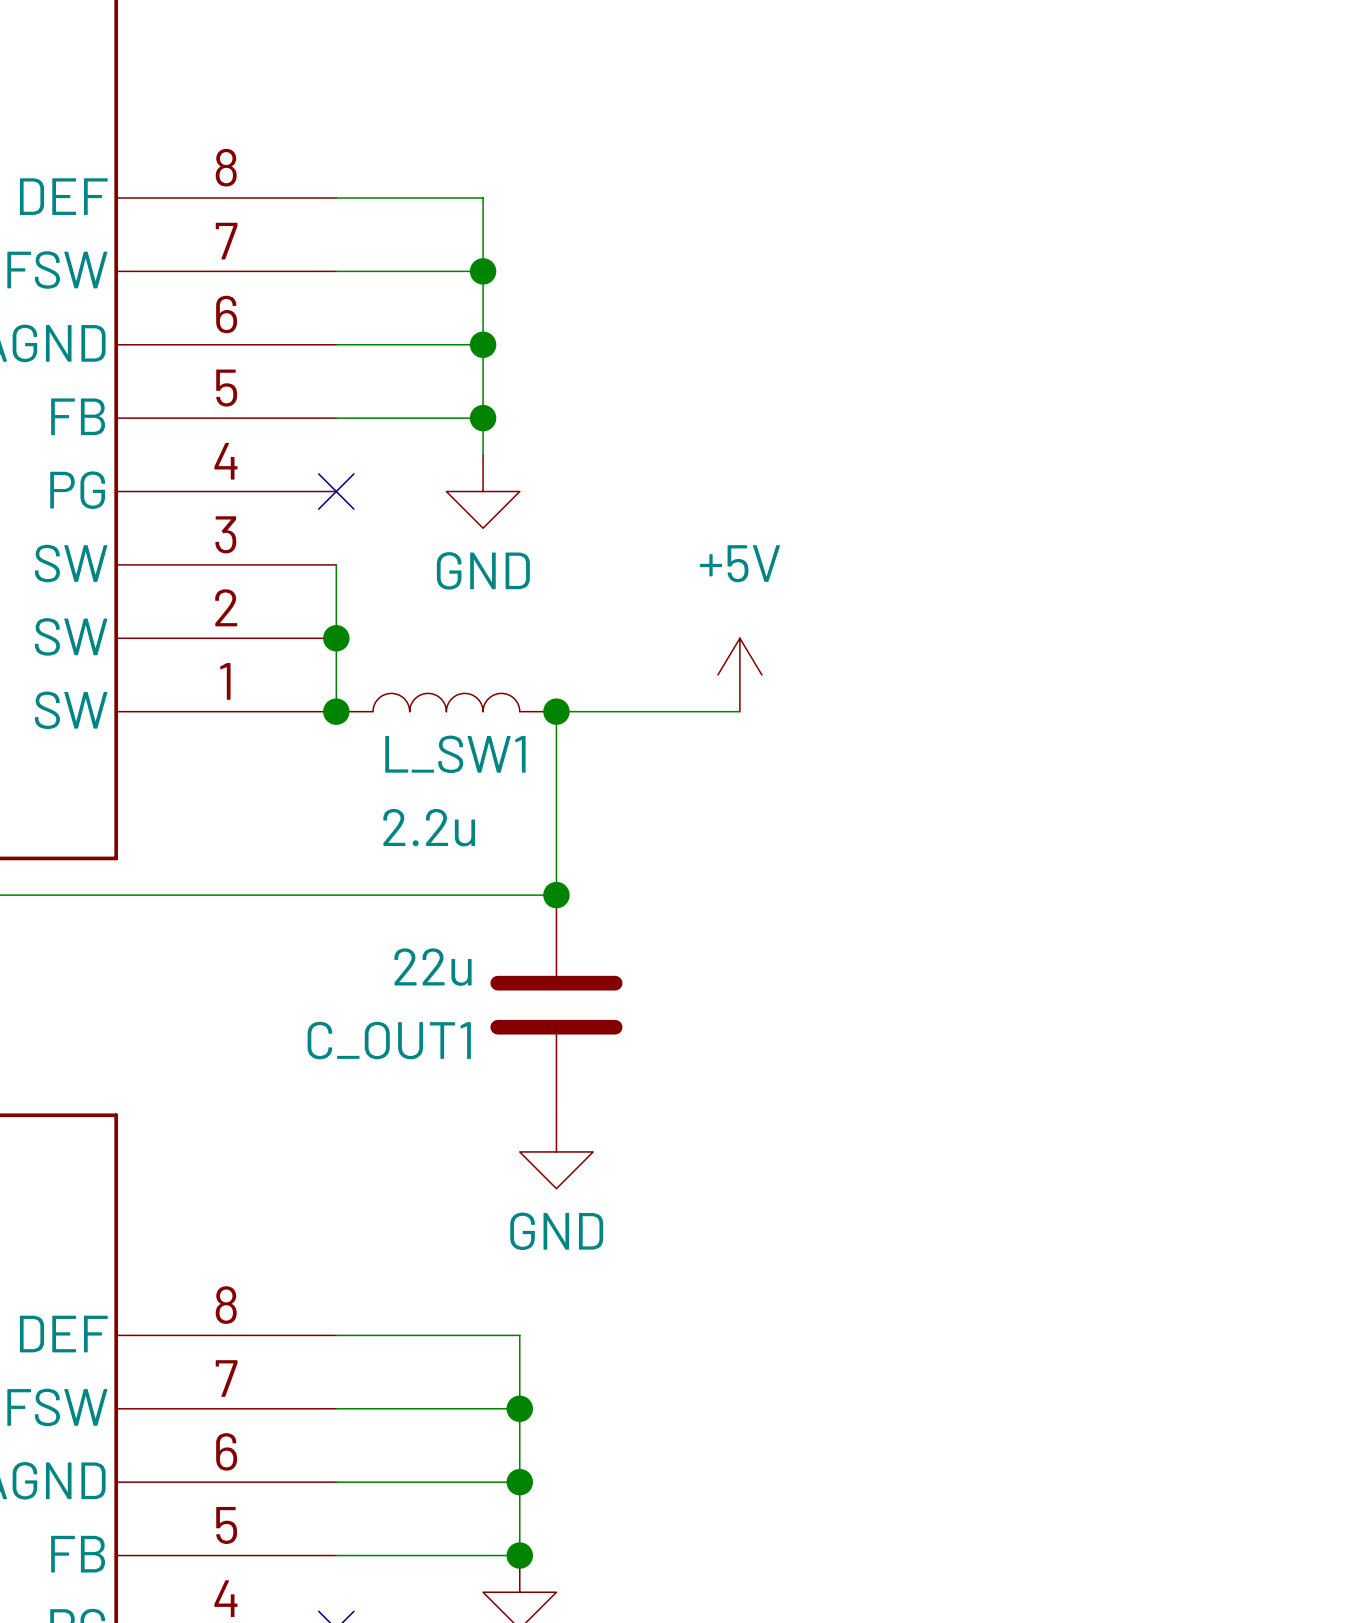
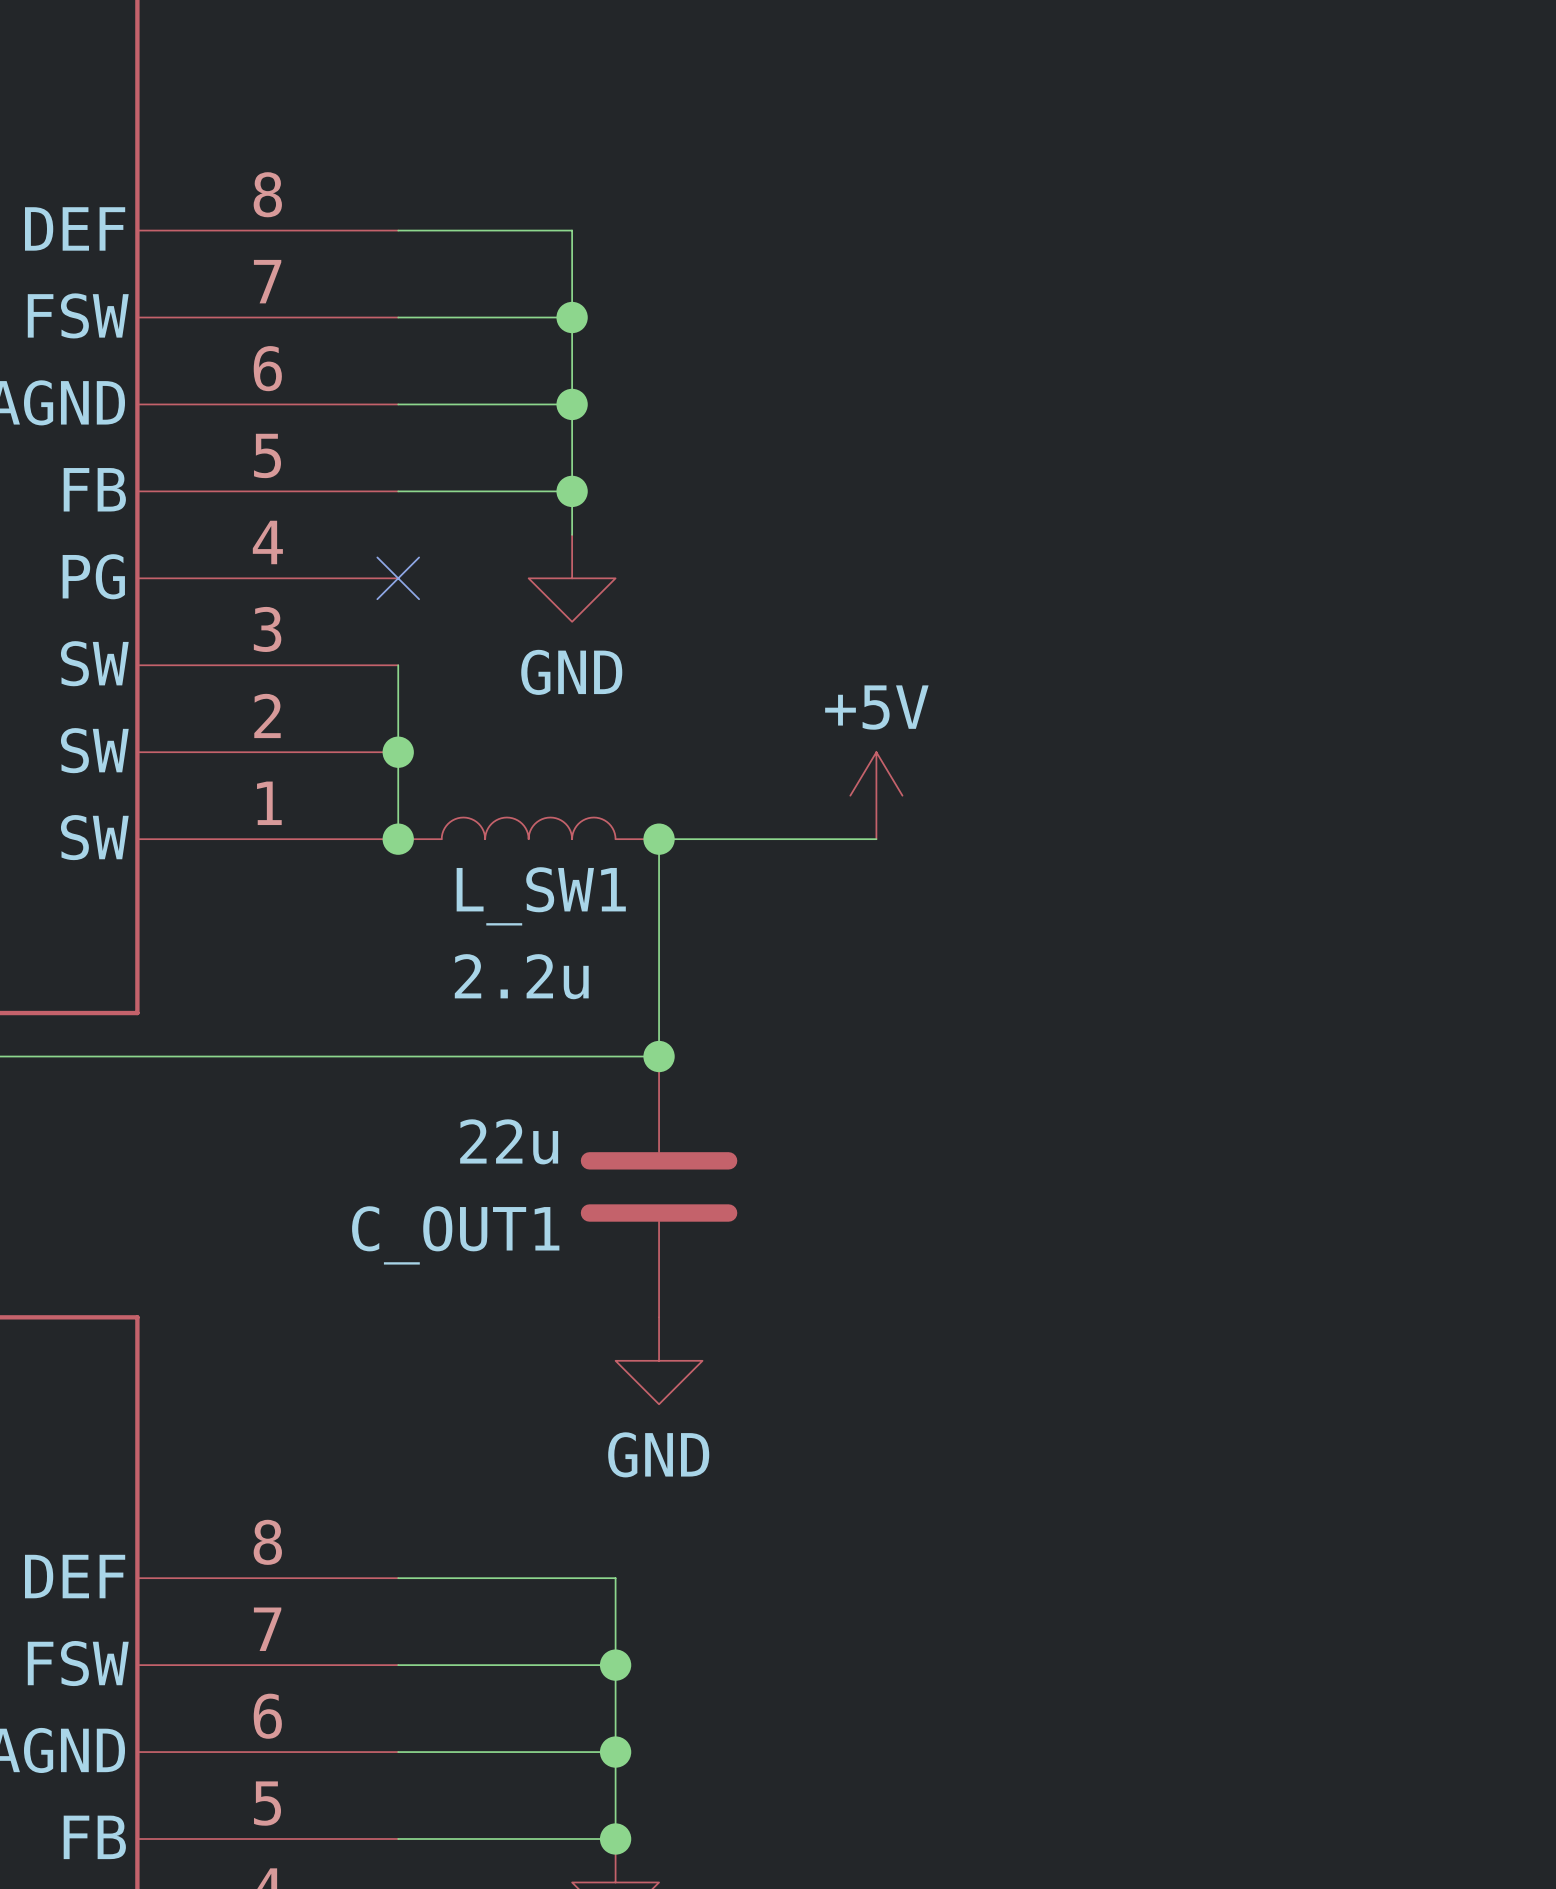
power symbol text position: +5V (740, 563) -> +5V (876, 707)

